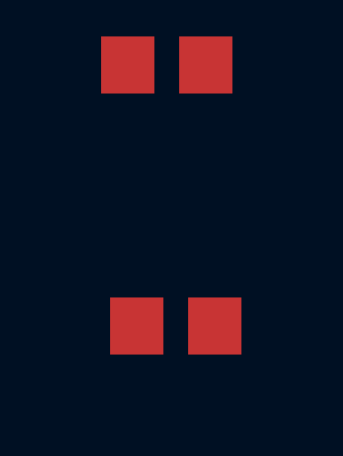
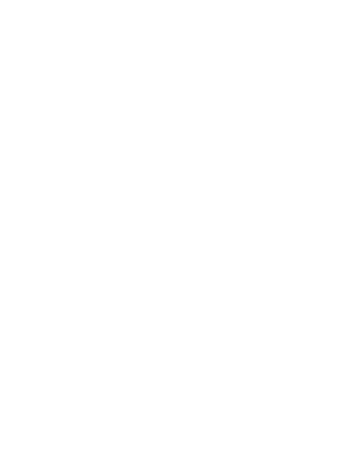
part: (166, 64) -> none
part: (175, 326) -> none

